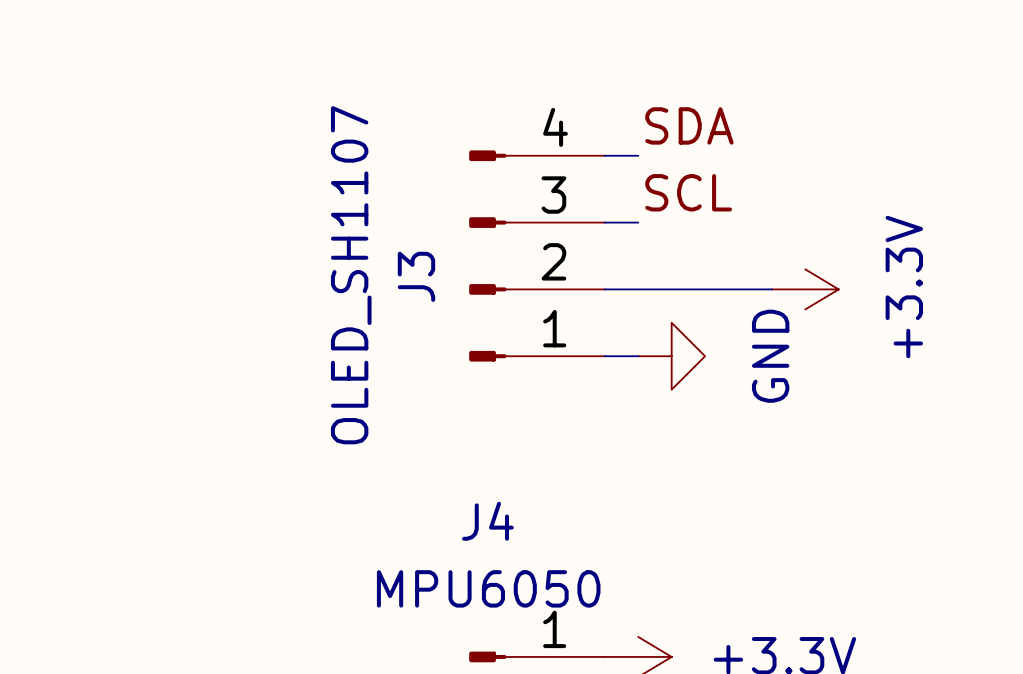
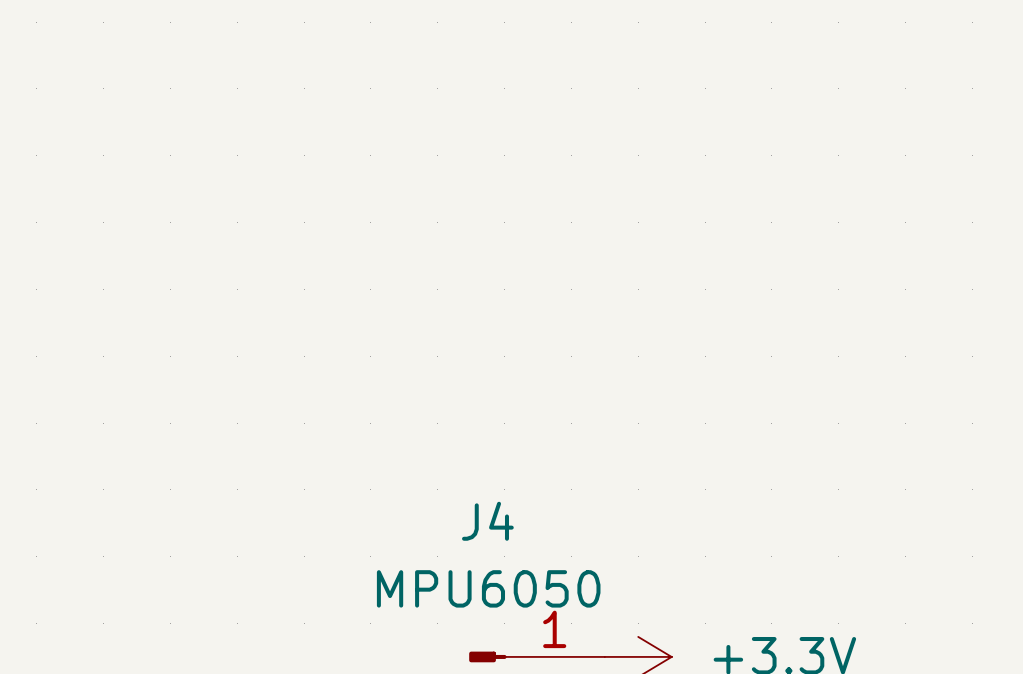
label: SDA (689, 125) -> none
wire: (604, 155) (638, 155) -> none
label: SCL (688, 192) -> none
wire: (604, 222) (638, 222) -> none
J3: OLED_SH1107 (537, 255) -> none
wire: (604, 289) (771, 289) -> none
power symbol: +3.3V (805, 289) -> none
wire: (604, 356) (638, 356) -> none
power symbol: GND (671, 356) -> none

